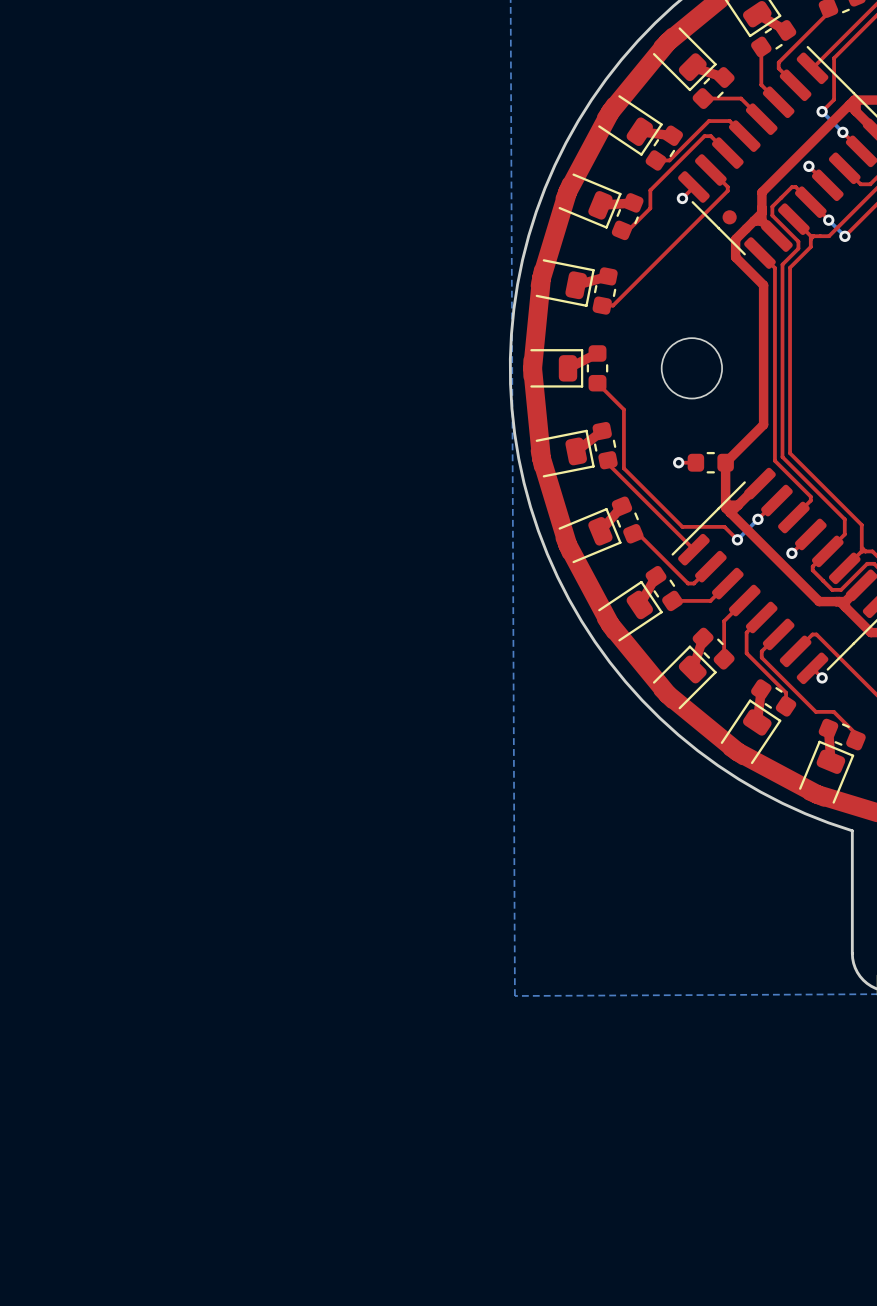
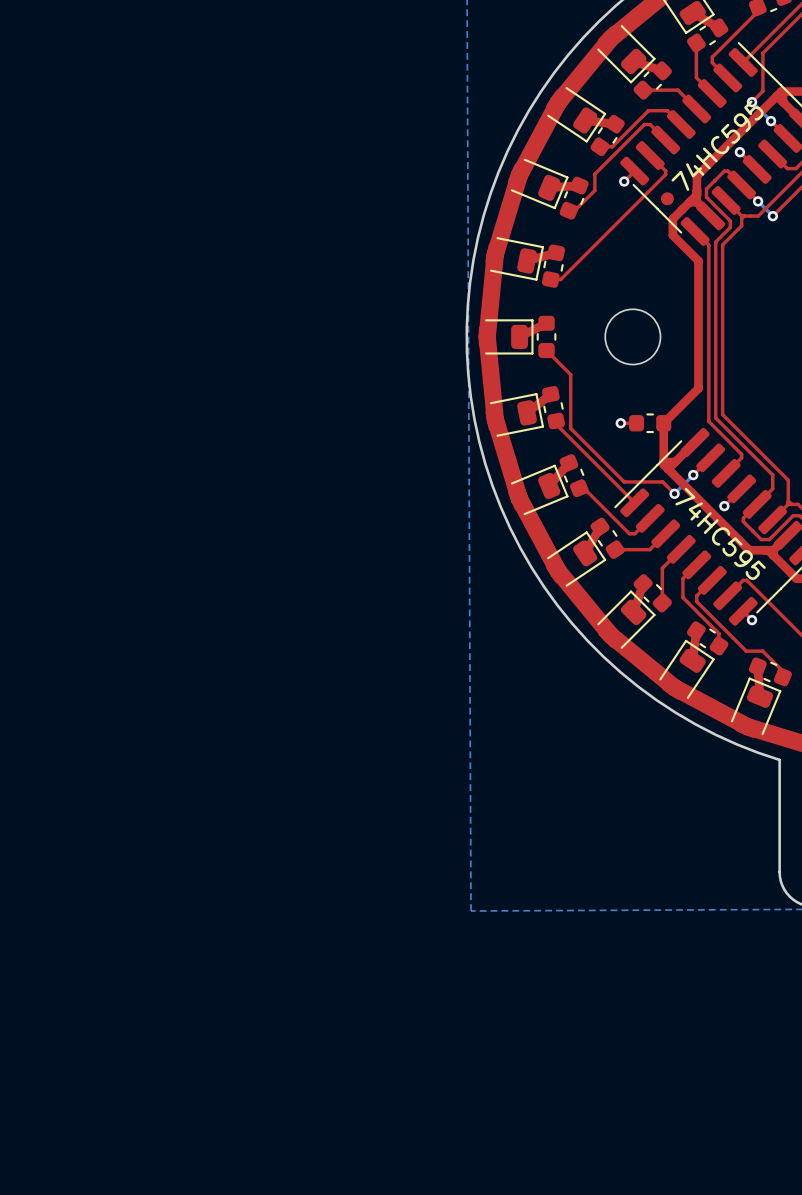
part value: none -> 74HC595 (717, 145)
part value: none -> 74HC595 (720, 533)

